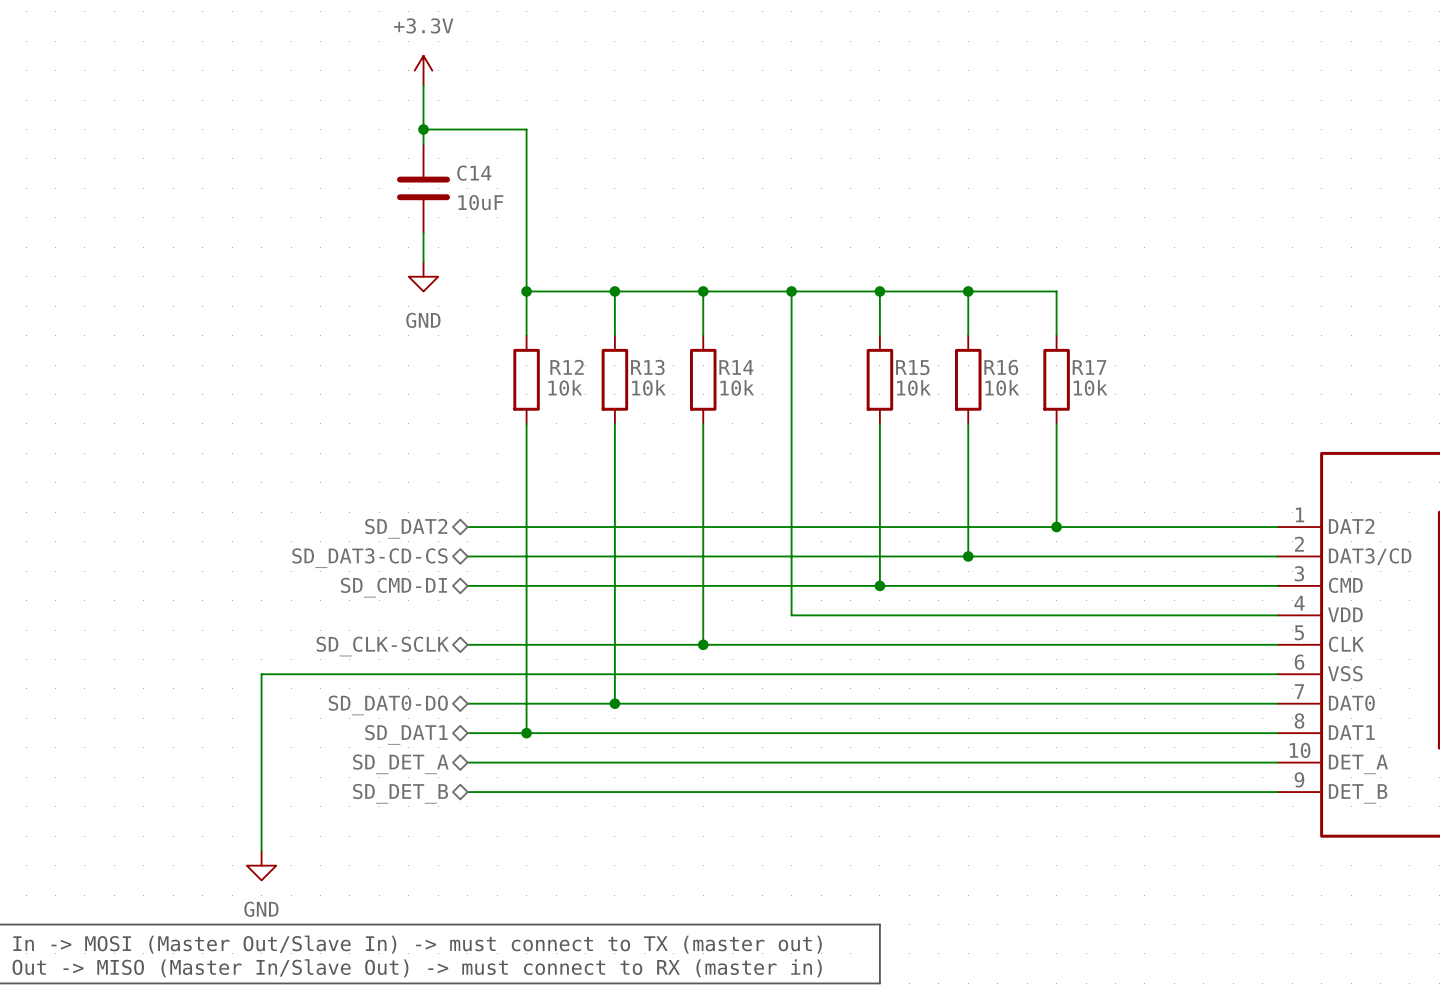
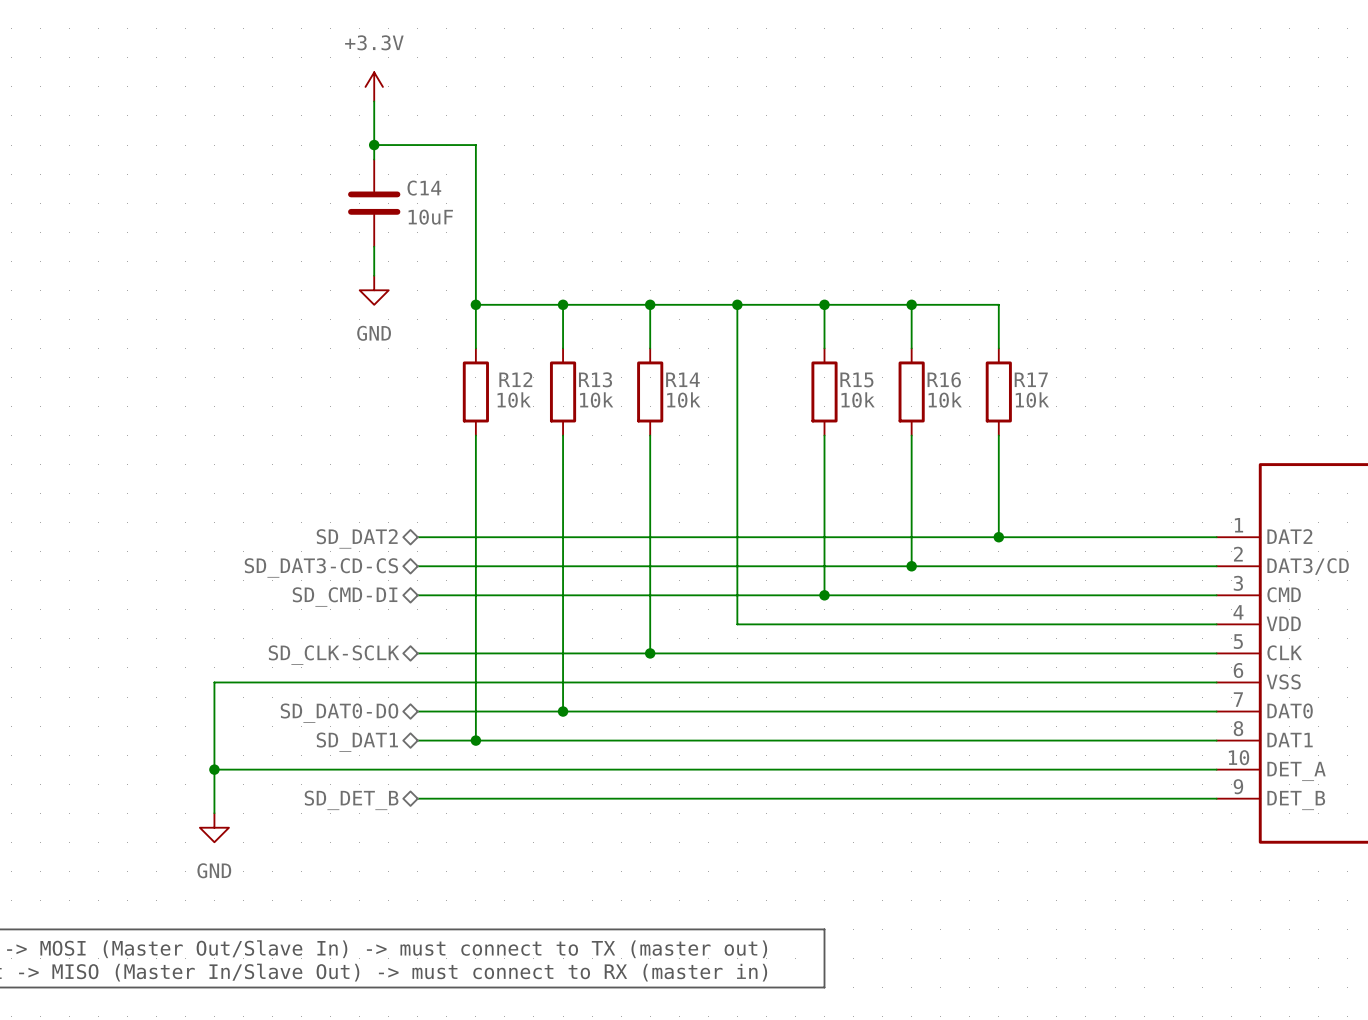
wire: none -> (214, 769) (417, 769)
junction: none -> (214, 769)
hierarchical label: SD_DET_A (400, 764) -> none
wire: (261, 806) (261, 850) -> none
power symbol position: GND (261, 865) -> GND (214, 827)

